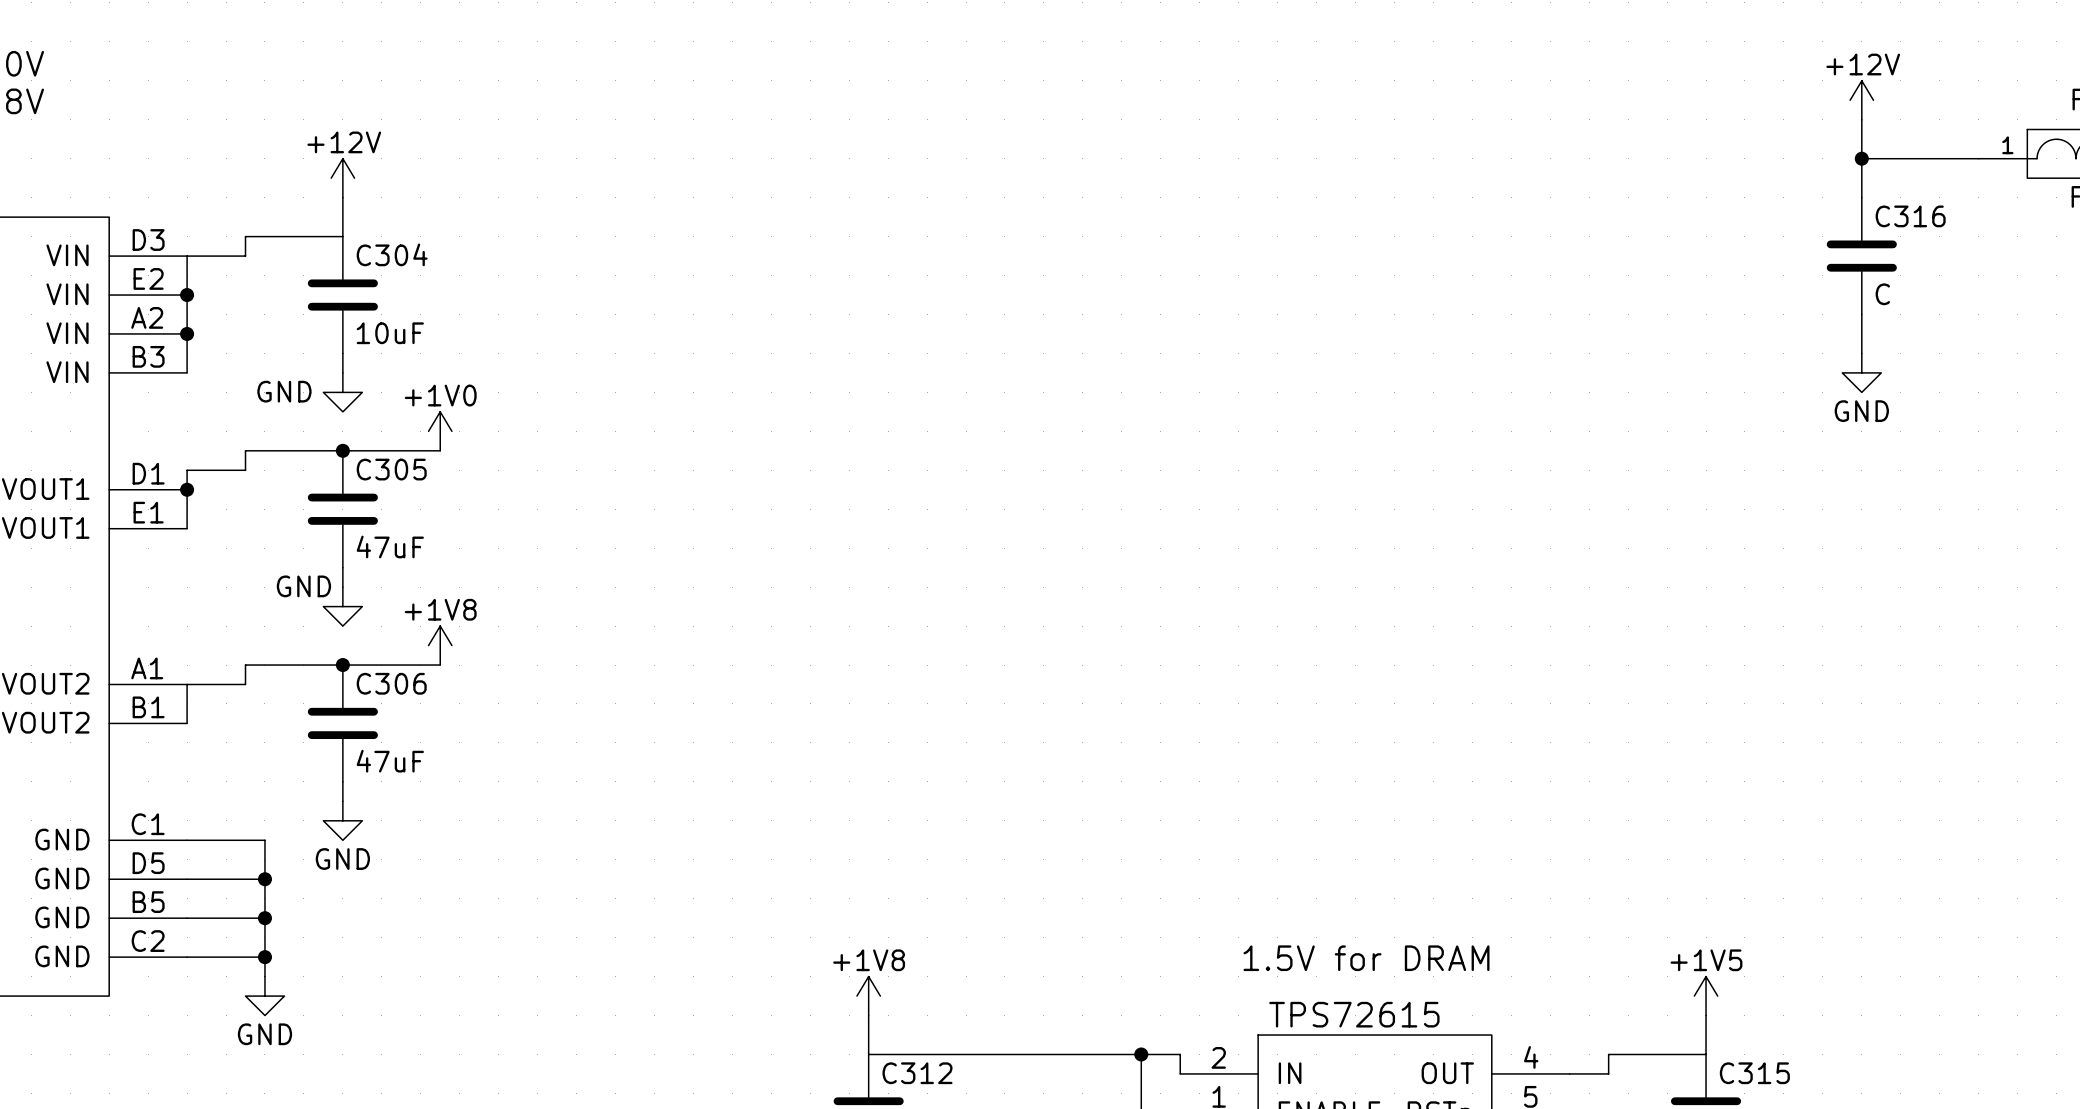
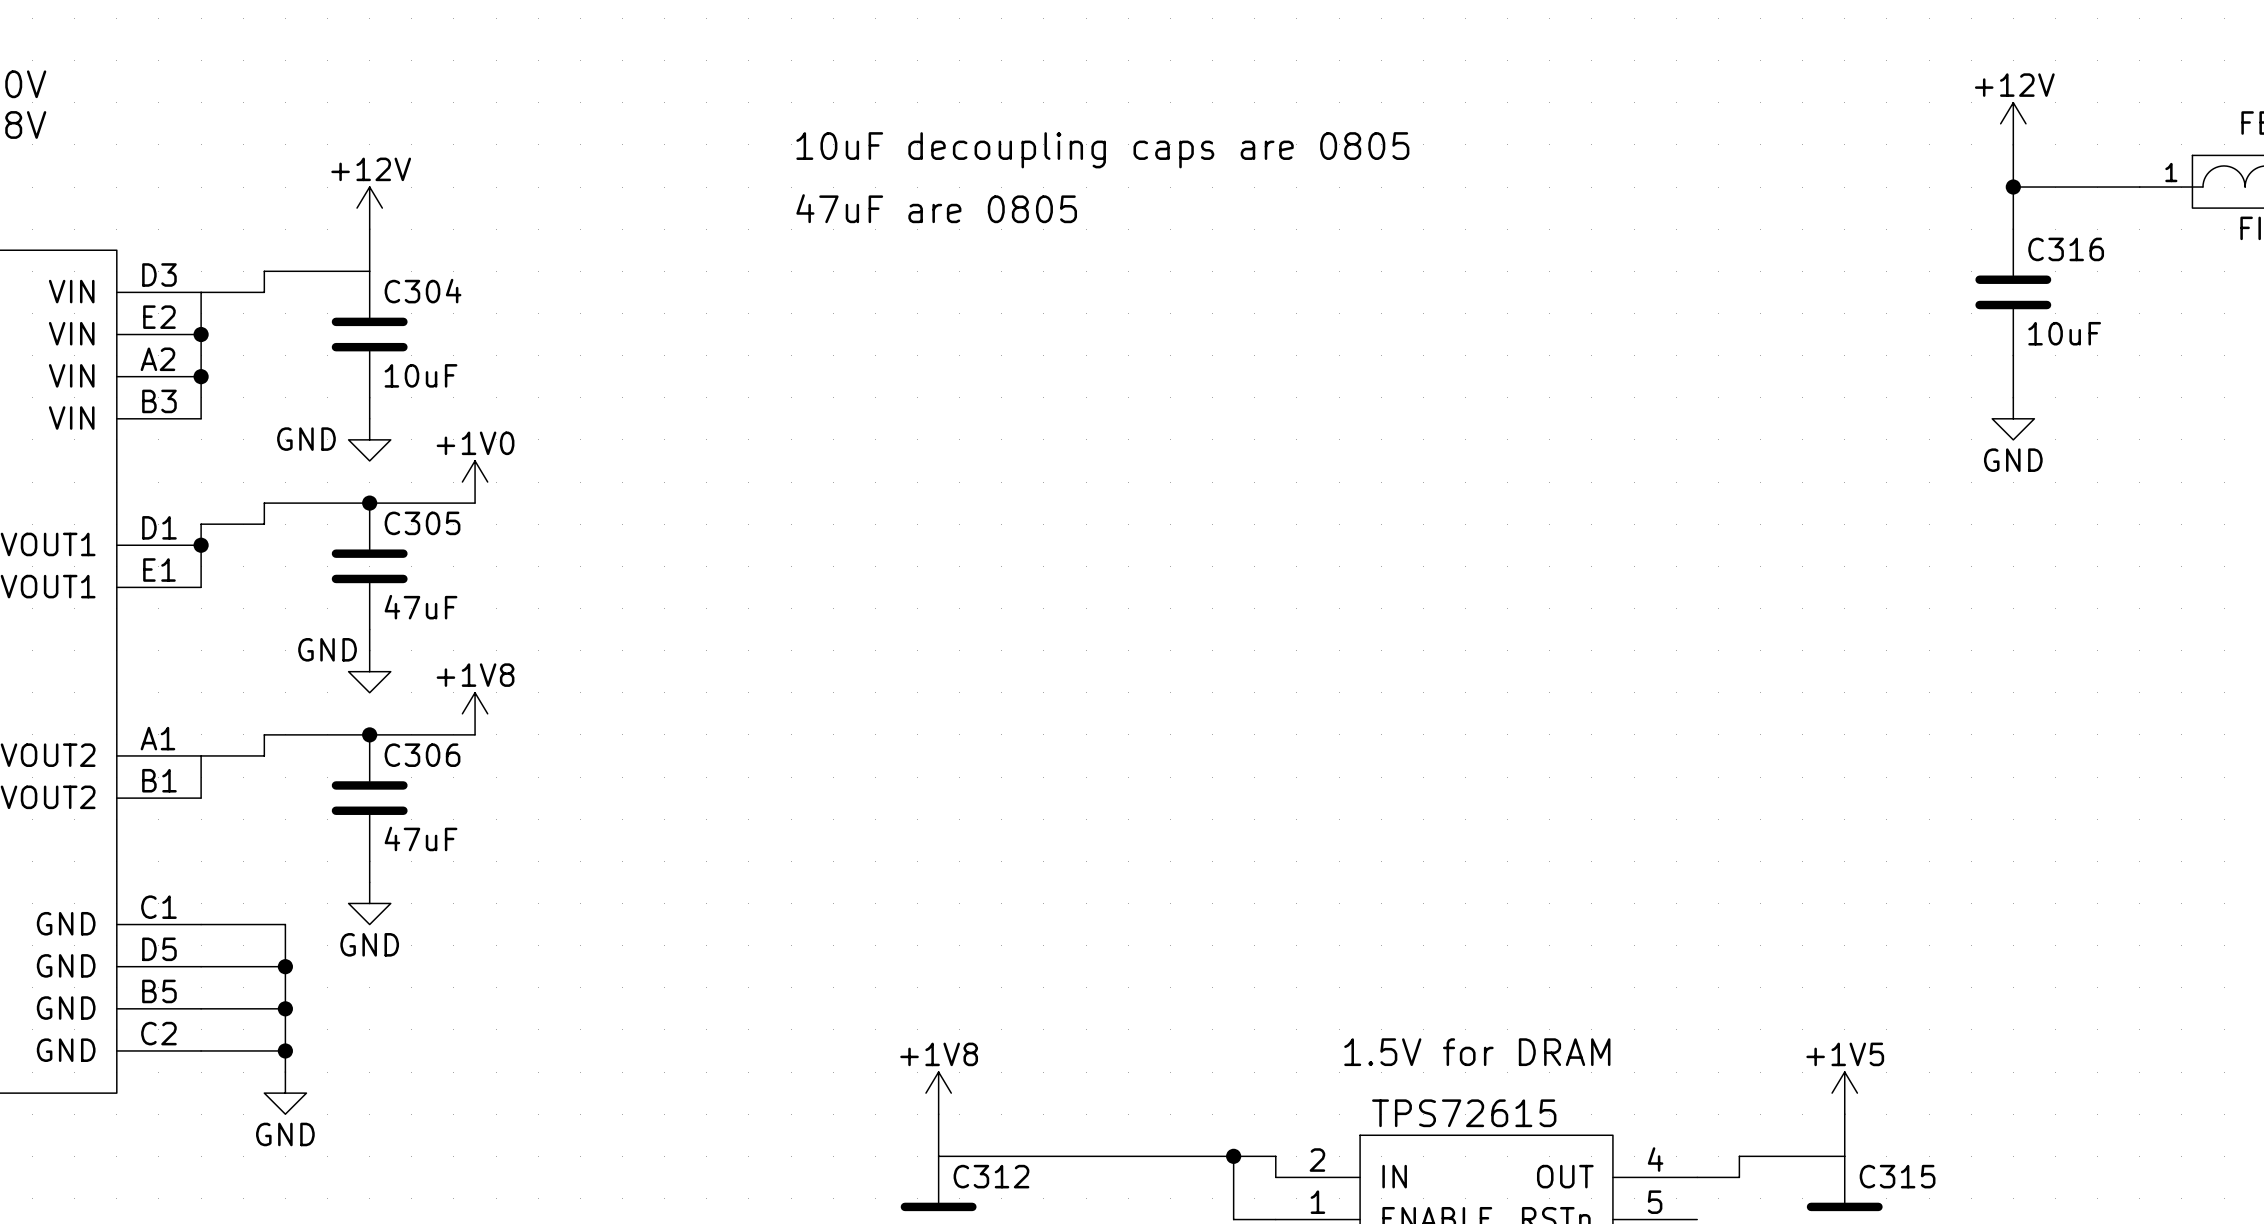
text: none -> 10uF decoupling caps are 0805 (1102, 150)
text: none -> 47uF are 0805 (936, 208)
C316 value: C (1882, 294) -> 10uF (2064, 333)

